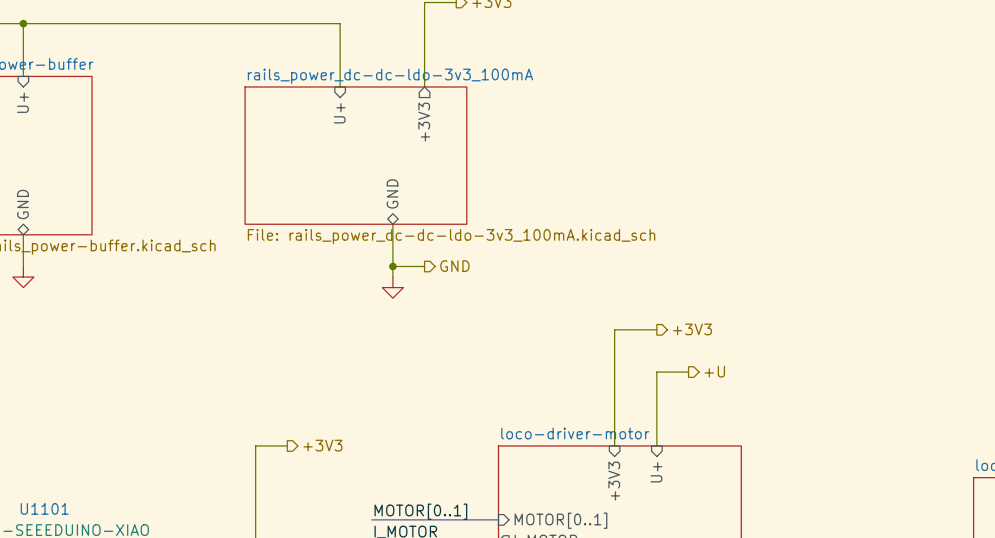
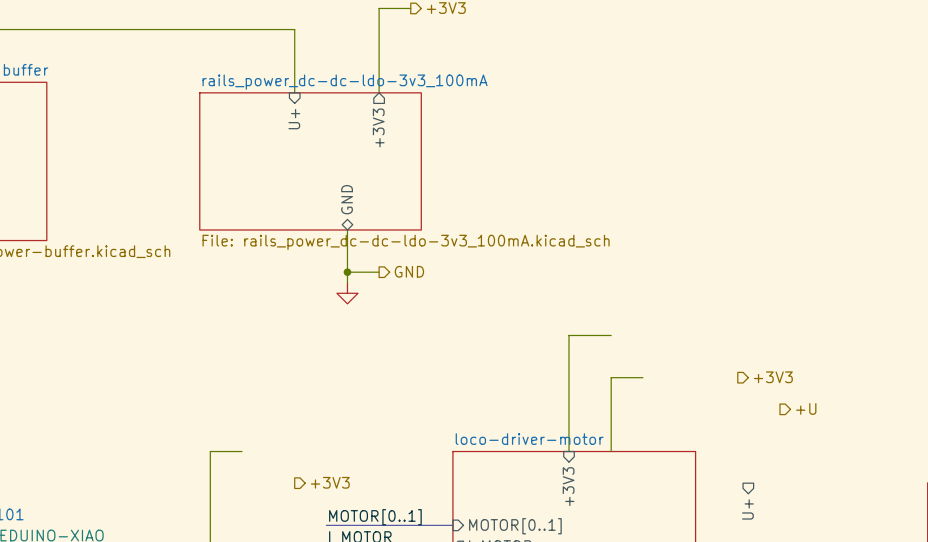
hierarchical label position: +3V3 (692, 329) -> +3V3 (773, 377)
hierarchical label position: +U (714, 371) -> +U (806, 408)
hierarchical label position: +3V3 (322, 445) -> +3V3 (330, 482)
sheet pin position: U+ (656, 472) -> U+ (747, 509)

